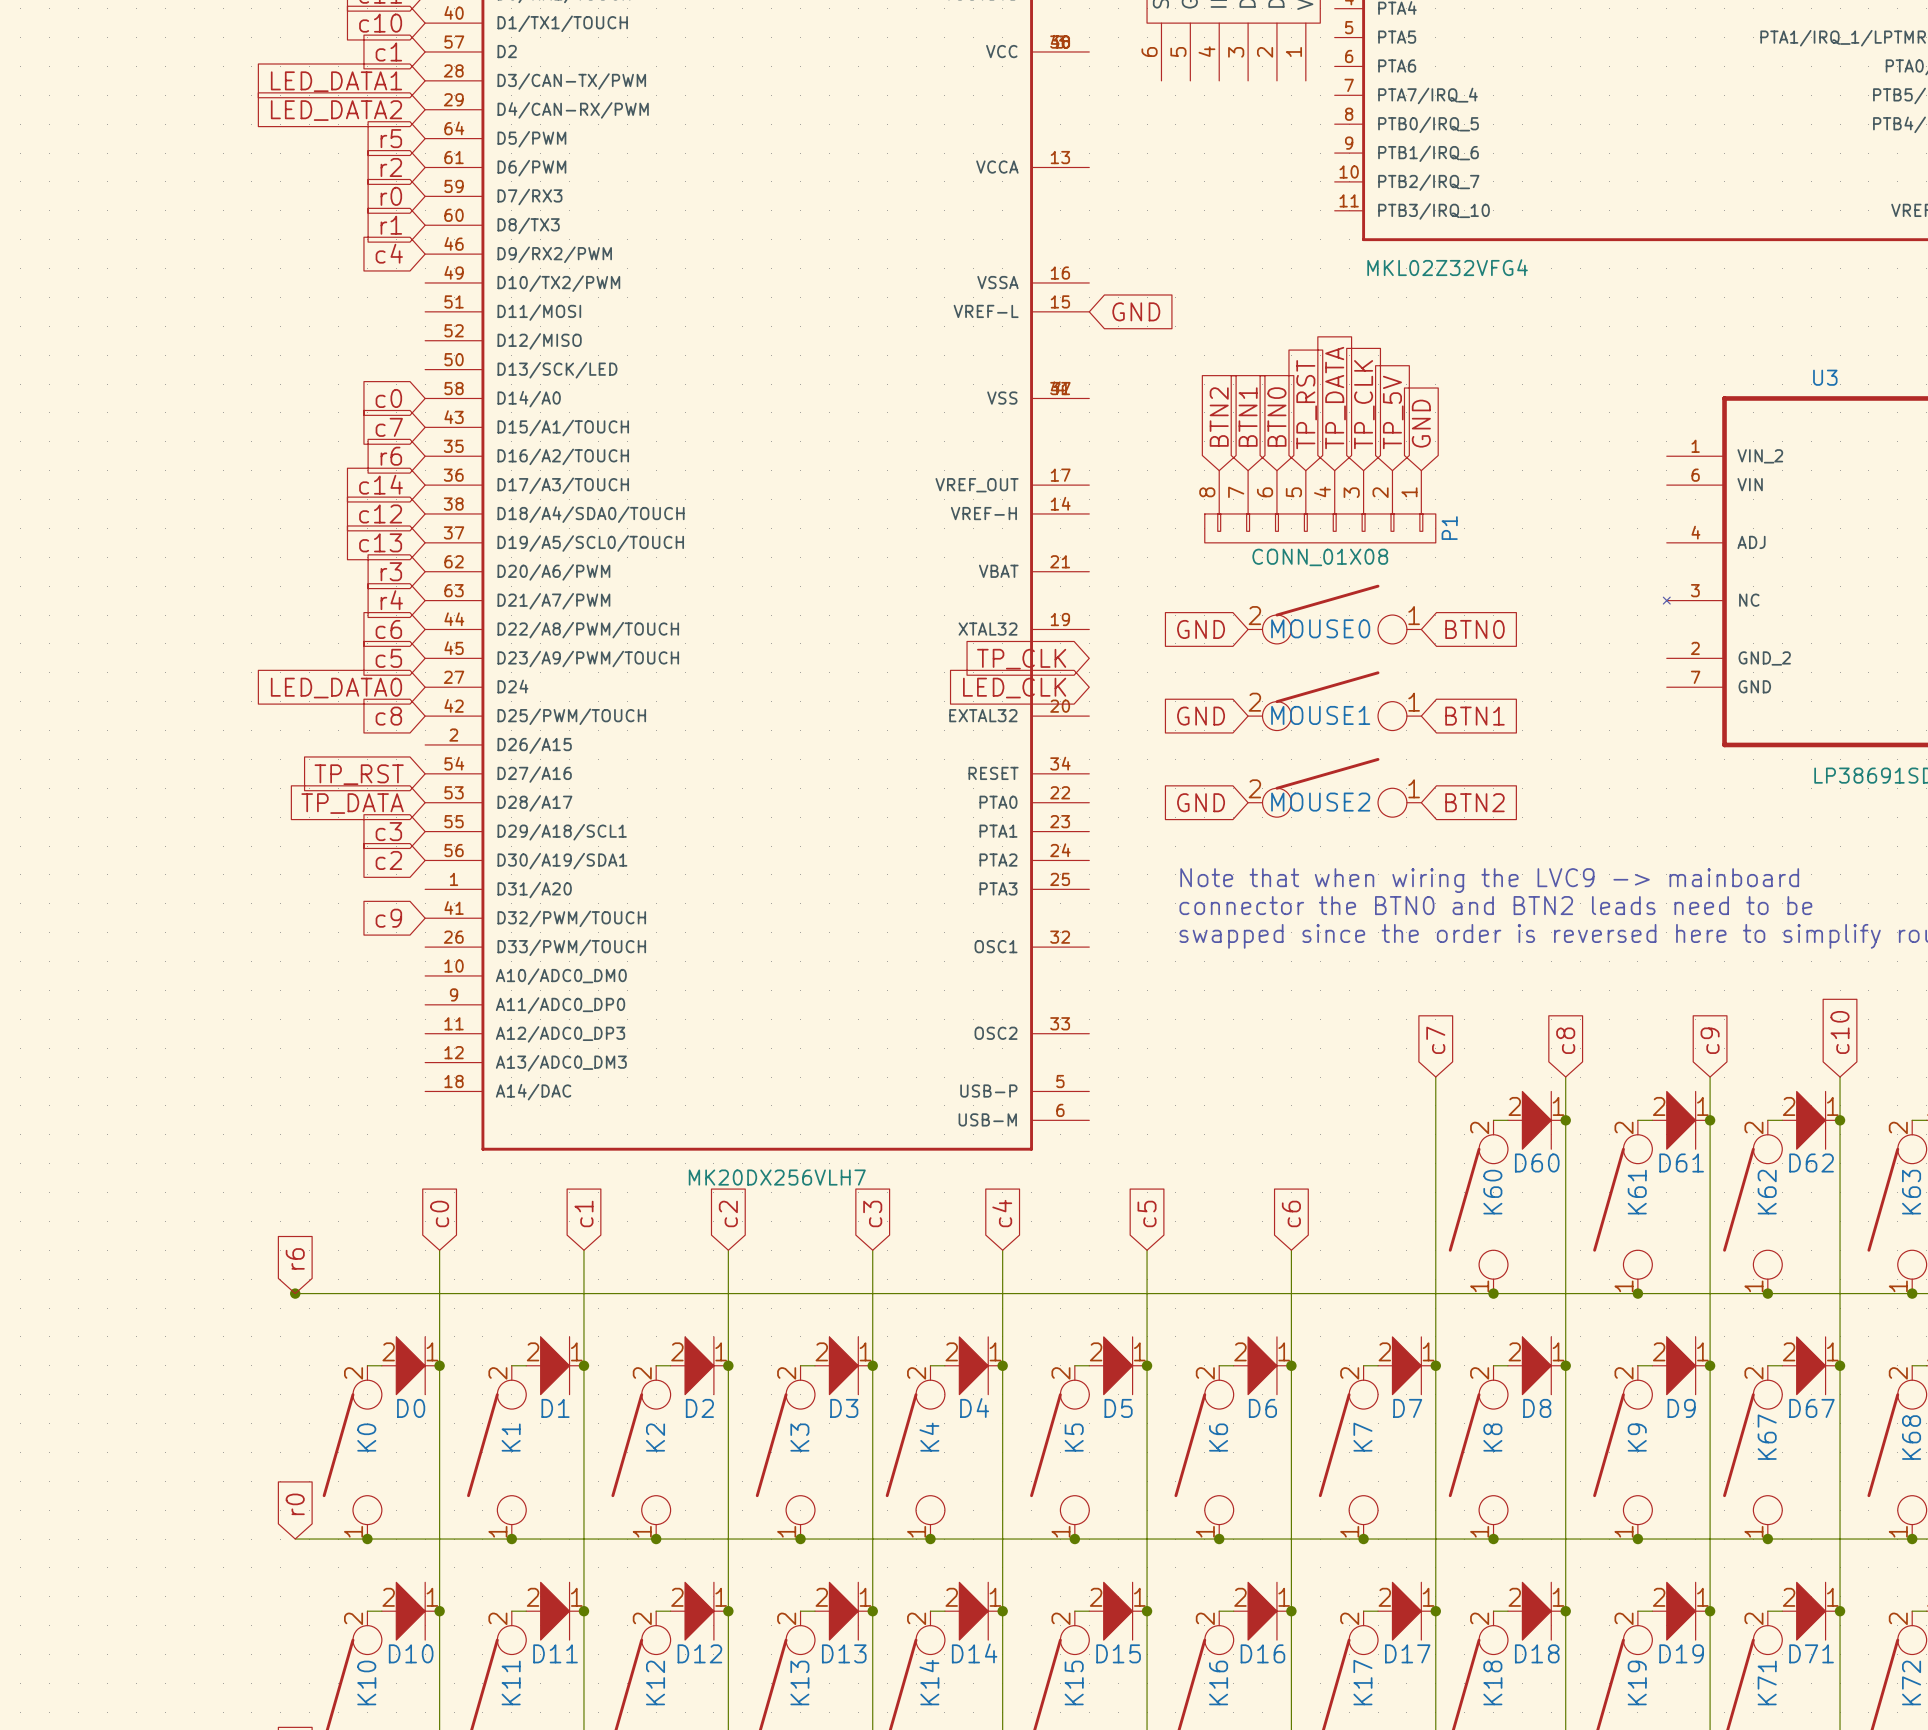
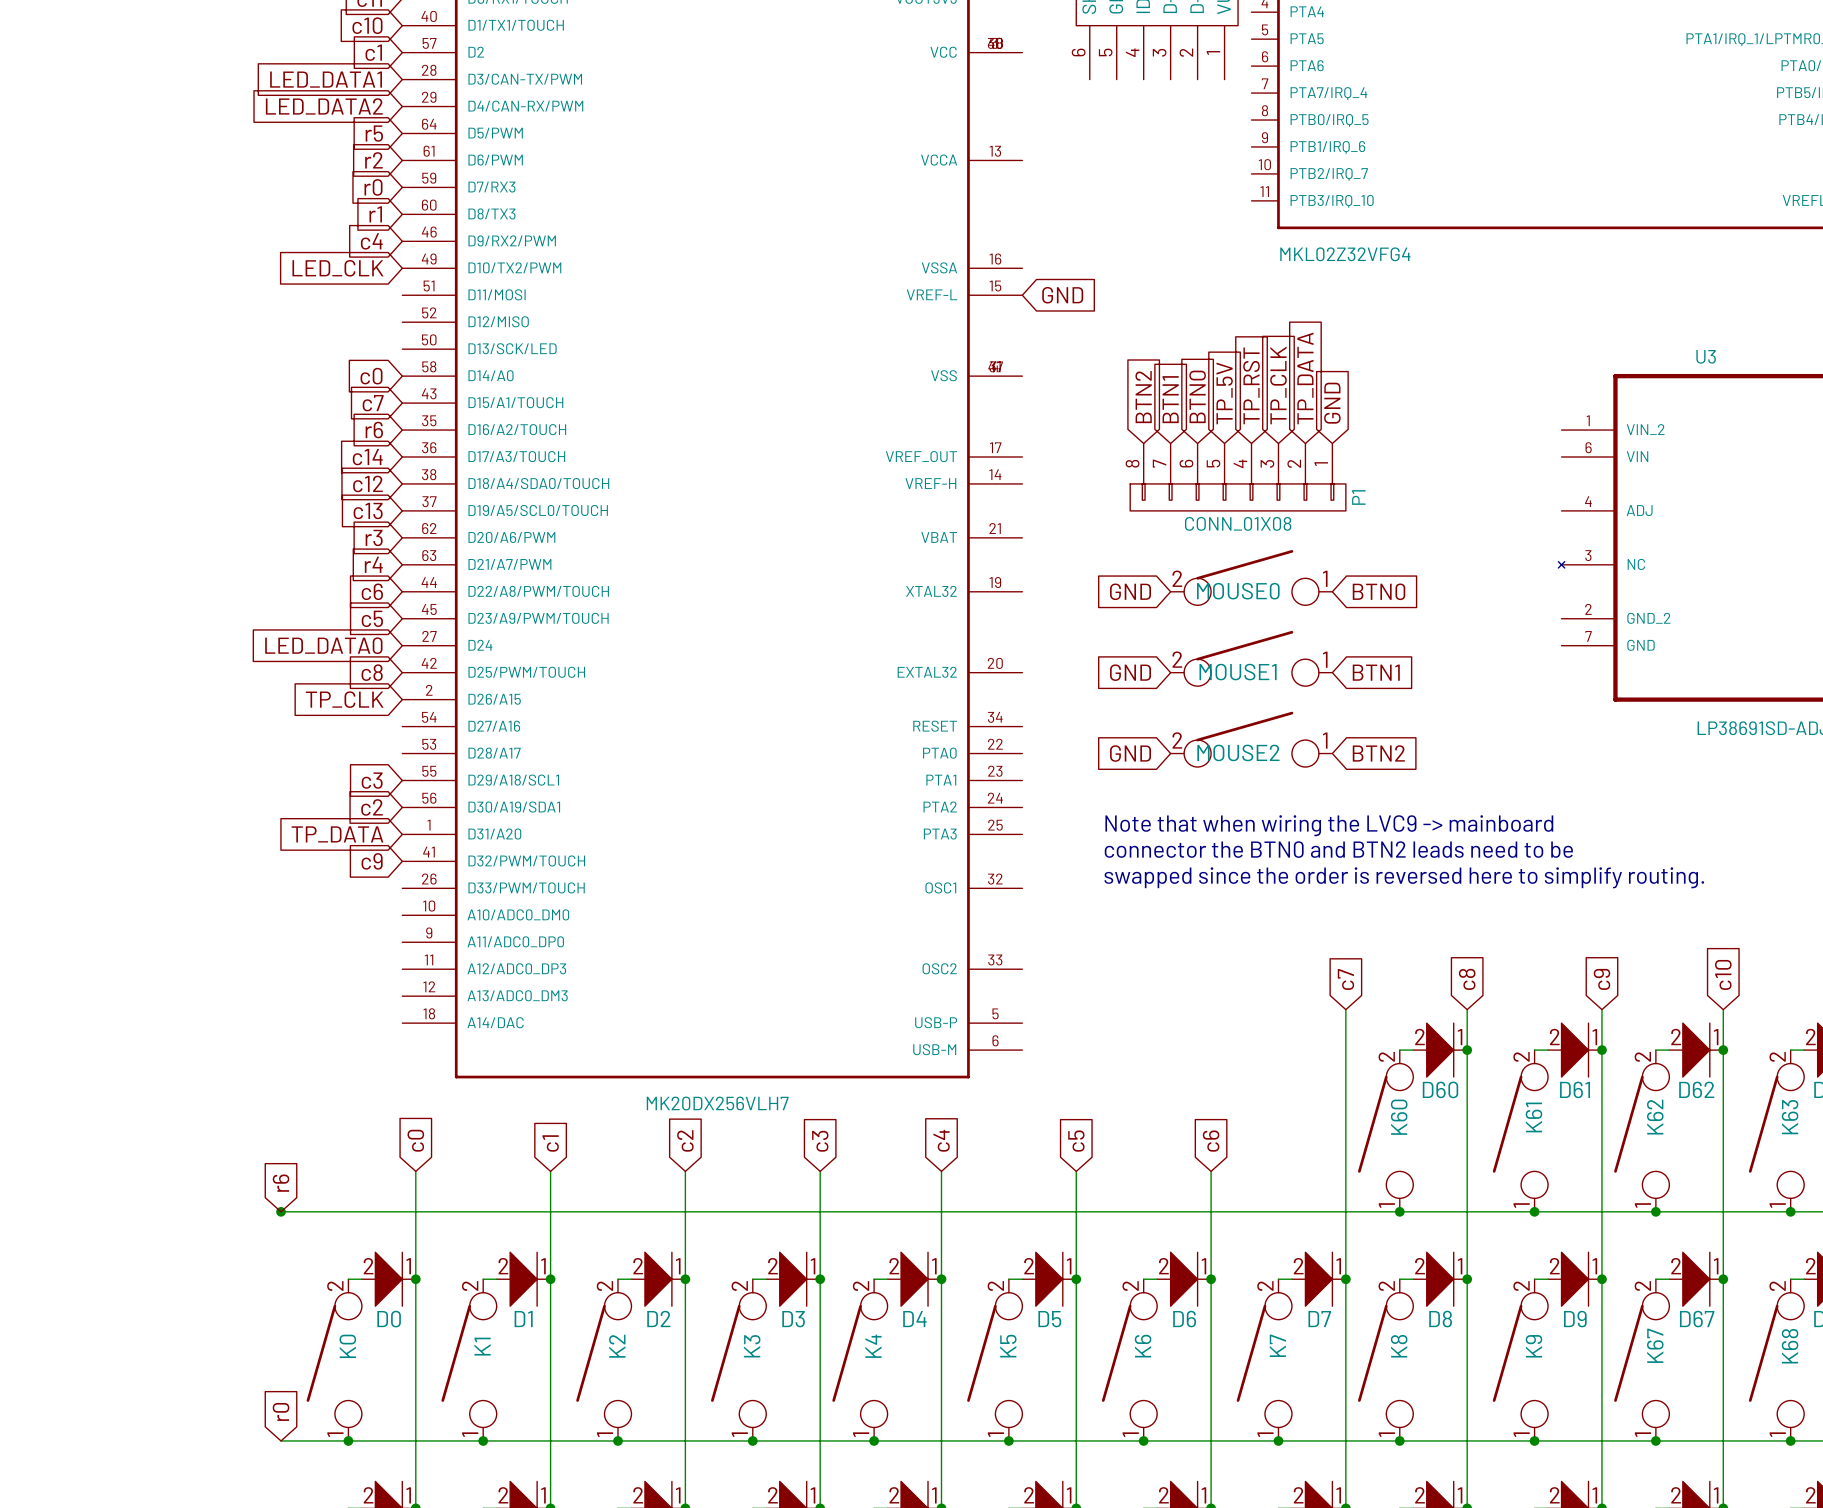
global label: none -> LED_CLK (337, 268)
global label: TP_DATA (1335, 398) -> TP_RST (1251, 385)
global label: TP_RST (1306, 404) -> TP_5V (1224, 393)
global label: TP_5V (1393, 412) -> TP_DATA (1305, 378)
global label: TP_CLK (1021, 659) -> none
global label: LED_CLK (1014, 688) -> none
global label: none -> TP_CLK (344, 699)
global label: TP_RST (359, 774) -> none
global label position: TP_DATA (352, 803) -> TP_DATA (337, 834)

